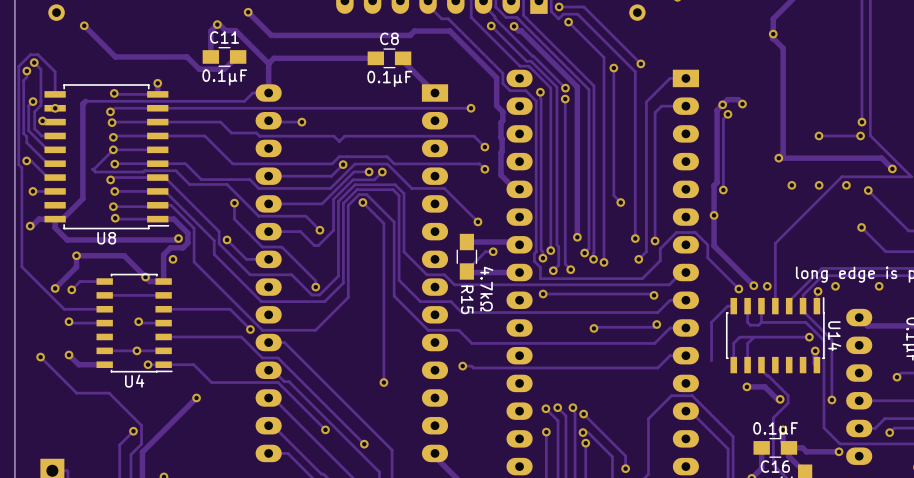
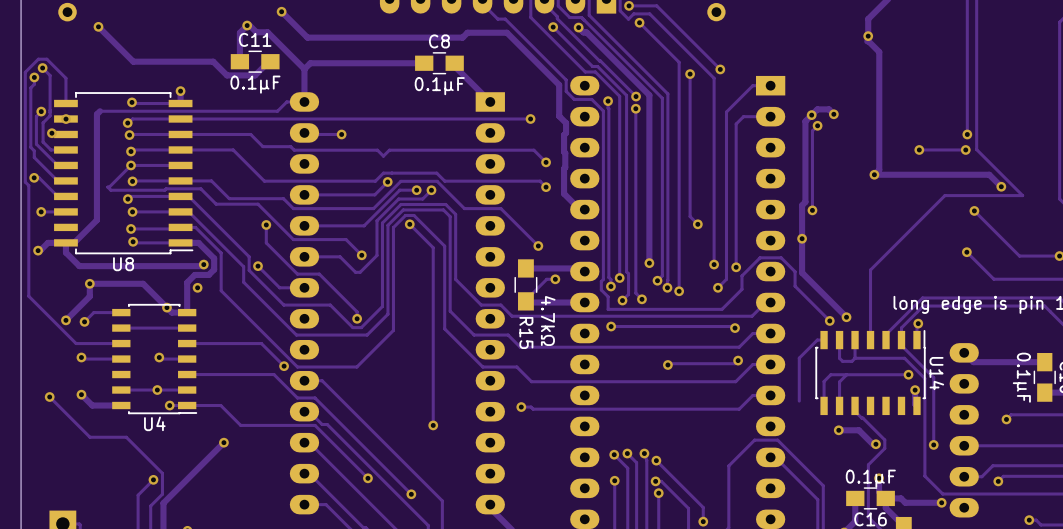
via: (791, 185) -> none
via: (819, 185) -> none
via: (846, 185) -> none
via: (767, 286) -> none
via: (835, 286) -> none
via: (879, 286) -> none

